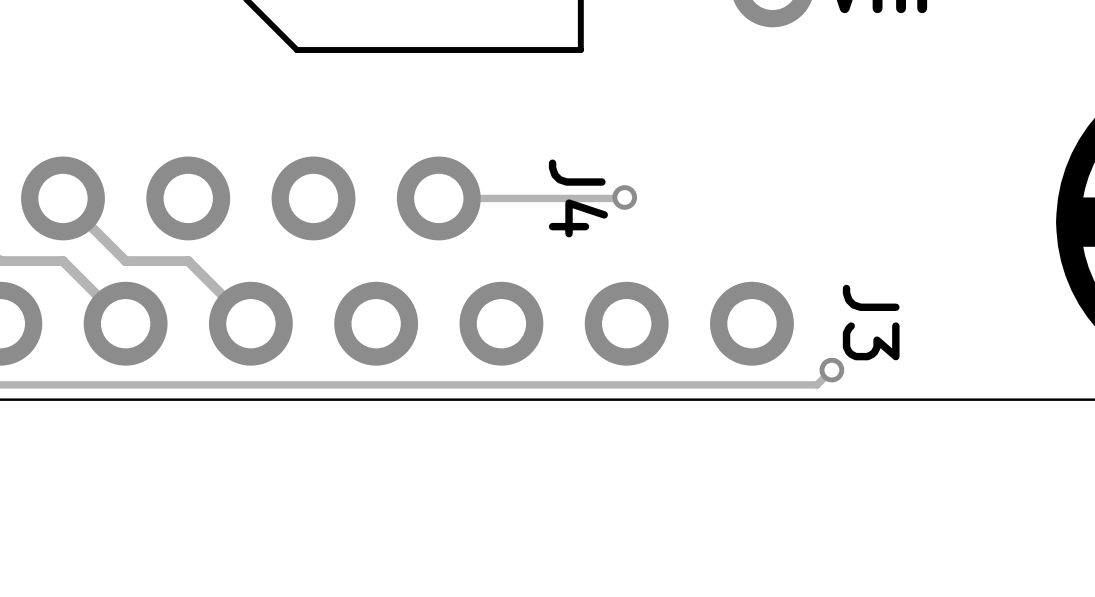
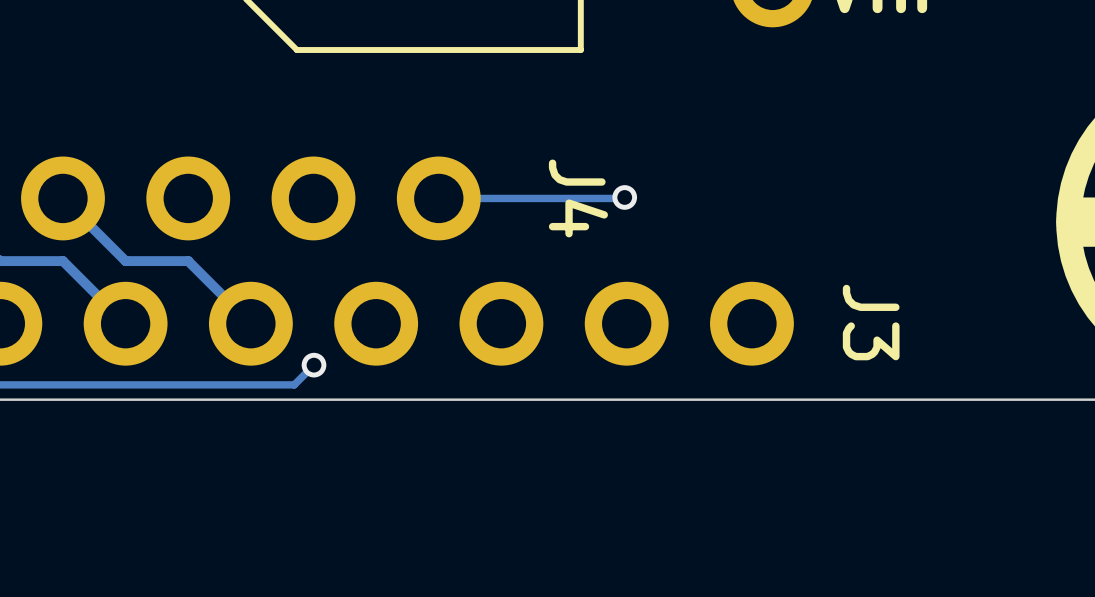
via: none -> (314, 365)
track: (831, 370) (817, 384) (294, 384) -> (314, 365) (294, 384)
via: (831, 370) -> none

